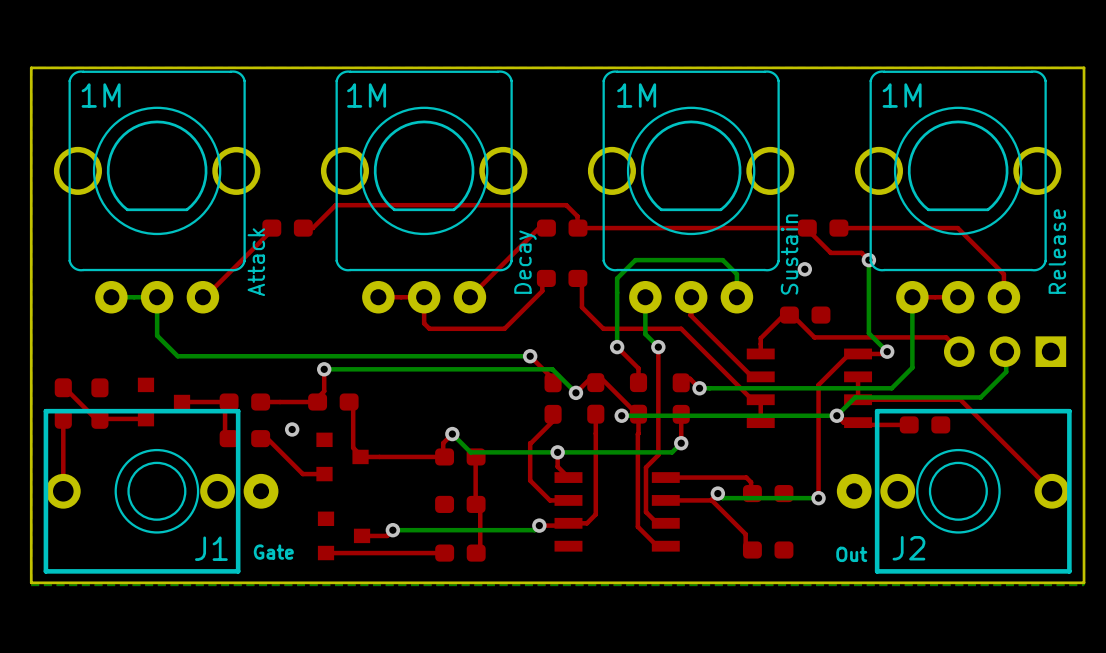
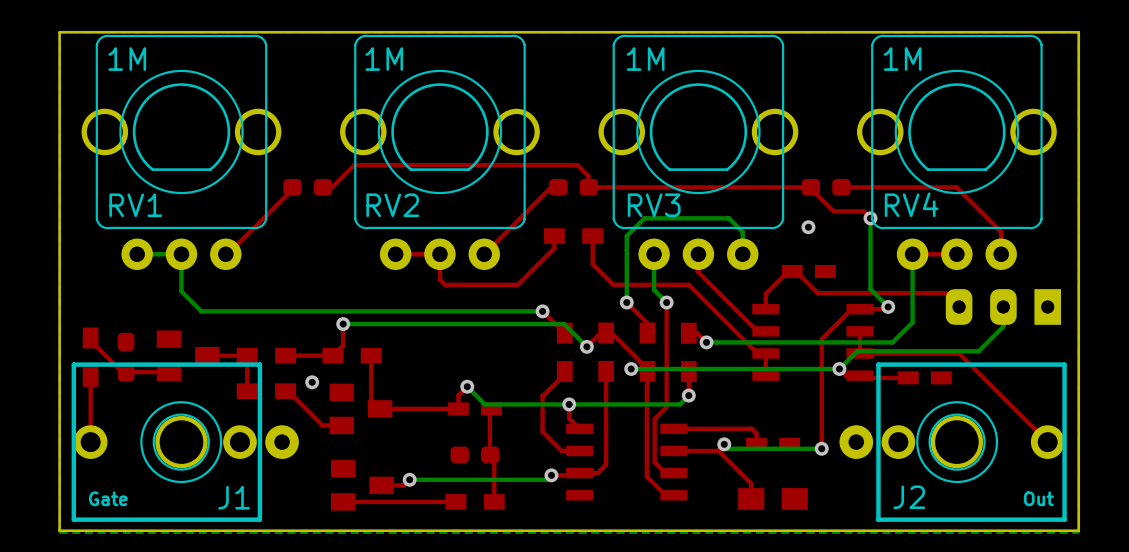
Release name: Release (1057, 251) -> RV4 (911, 204)
Sustain name: Sustain (789, 254) -> RV3 (654, 205)
Attack name: Attack (256, 262) -> RV1 (135, 205)
Decay name: Decay (525, 262) -> RV2 (392, 205)
part footprint: [536, 269, 588, 287] -> [543, 228, 604, 244]
part footprint: [779, 306, 831, 324] -> [781, 264, 836, 279]
part footprint: [943, 336, 1067, 367] -> [945, 289, 1062, 325]
part footprint: [544, 373, 562, 424] -> [556, 322, 573, 383]
part footprint: [587, 373, 605, 424] -> [598, 322, 614, 382]
part footprint: [629, 373, 648, 424] -> [639, 322, 656, 382]
part footprint: [672, 373, 690, 424] -> [680, 322, 697, 383]
part footprint: [137, 377, 191, 427] -> [156, 330, 220, 382]
part footprint: [54, 378, 72, 429] -> [82, 327, 99, 387]
part footprint: [219, 393, 271, 411] -> [236, 347, 297, 364]
part footprint: [308, 393, 359, 411] -> [322, 347, 382, 364]
J1 footprint: [43, 408, 279, 574] -> [71, 362, 299, 522]
J2 footprint: [836, 408, 1072, 574] -> [839, 362, 1067, 522]
part footprint: [899, 416, 951, 434] -> [897, 371, 952, 385]
part footprint: [219, 430, 271, 448] -> [236, 383, 297, 400]
part footprint: [316, 432, 369, 482] -> [329, 383, 393, 435]
part footprint: [435, 448, 486, 466] -> [447, 402, 503, 416]
part footprint: [742, 485, 794, 503] -> [745, 437, 801, 451]
part footprint: [317, 511, 371, 561] -> [331, 460, 394, 511]
part footprint: [742, 541, 794, 559] -> [738, 488, 808, 510]
part footprint: [435, 544, 486, 562] -> [445, 494, 505, 510]
J1 value position: Gate (273, 552) -> Gate (108, 498)
J2 value position: Out (851, 554) -> Out (1038, 498)

